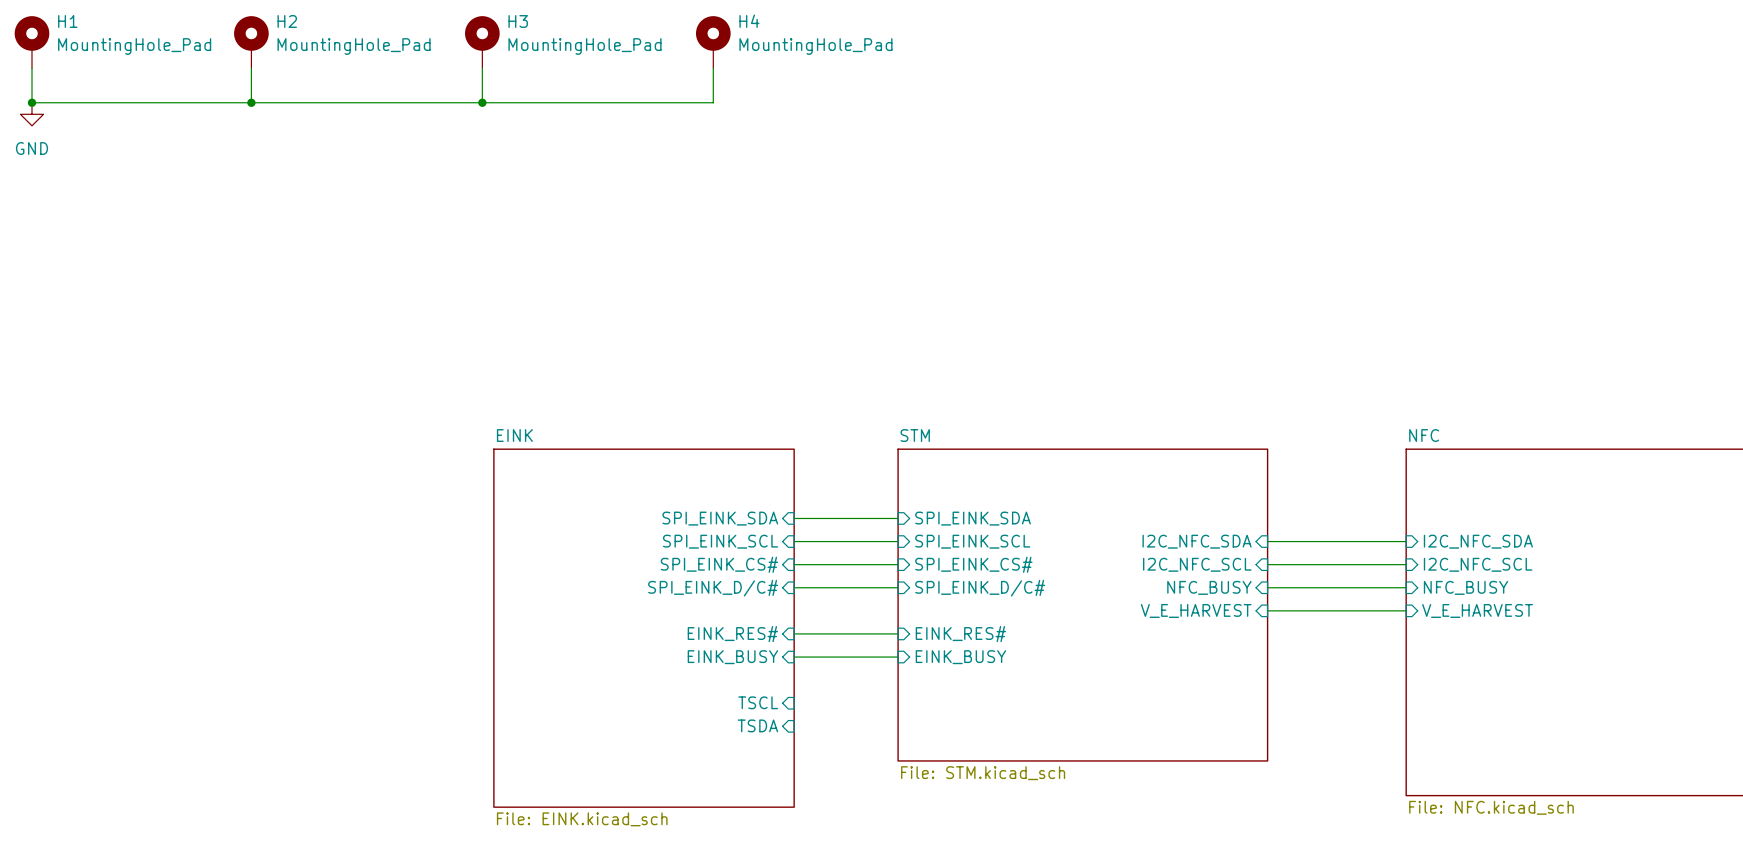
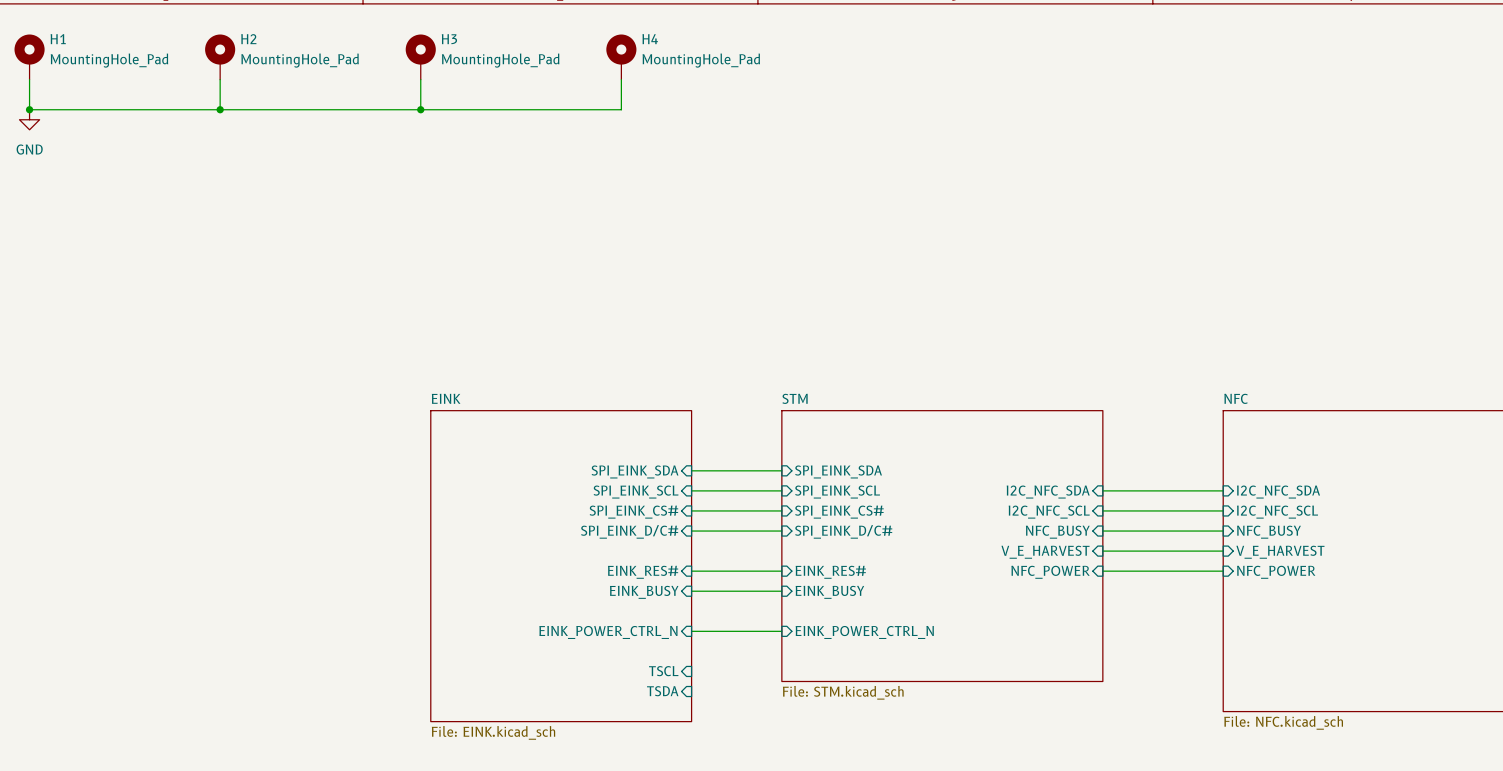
wire: none -> (1102, 571) (1223, 571)
sheet pin: none -> NFC_POWER (1050, 572)
sheet pin: none -> NFC_POWER (1276, 572)
sheet pin: TSCL (758, 702) -> EINK_POWER_CTRL_N (608, 632)
wire: none -> (691, 631) (781, 631)
sheet pin: none -> EINK_POWER_CTRL_N (864, 632)
sheet pin position: TSDA (757, 725) -> TSDA (662, 691)
sheet pin: none -> TSCL (663, 671)

